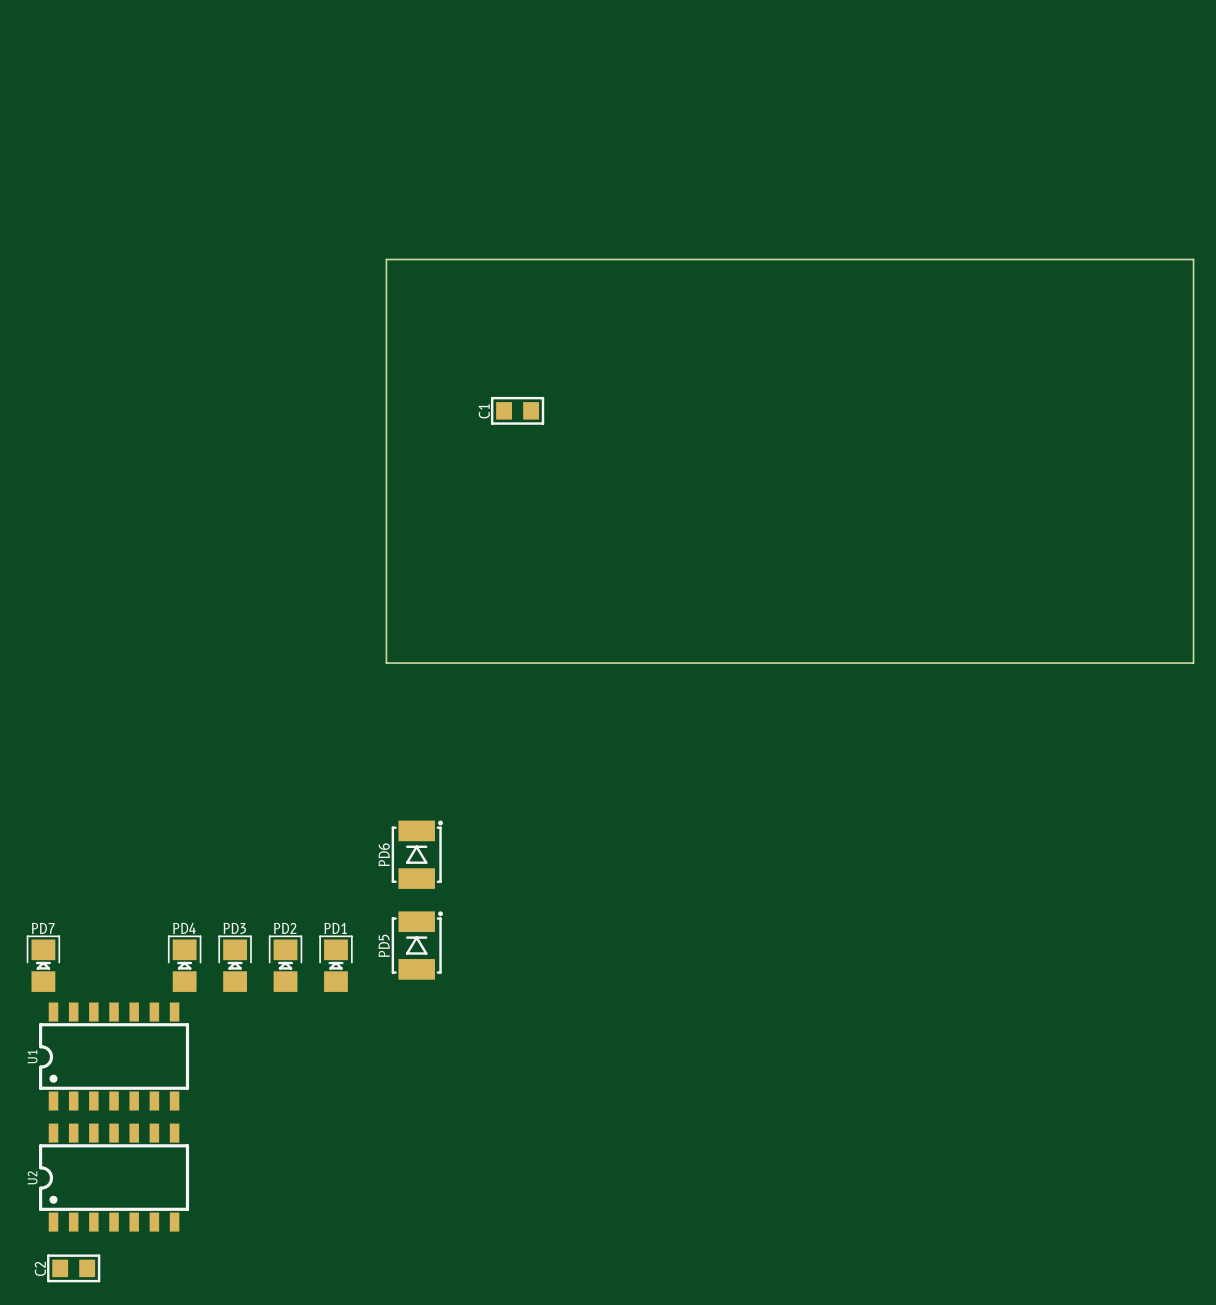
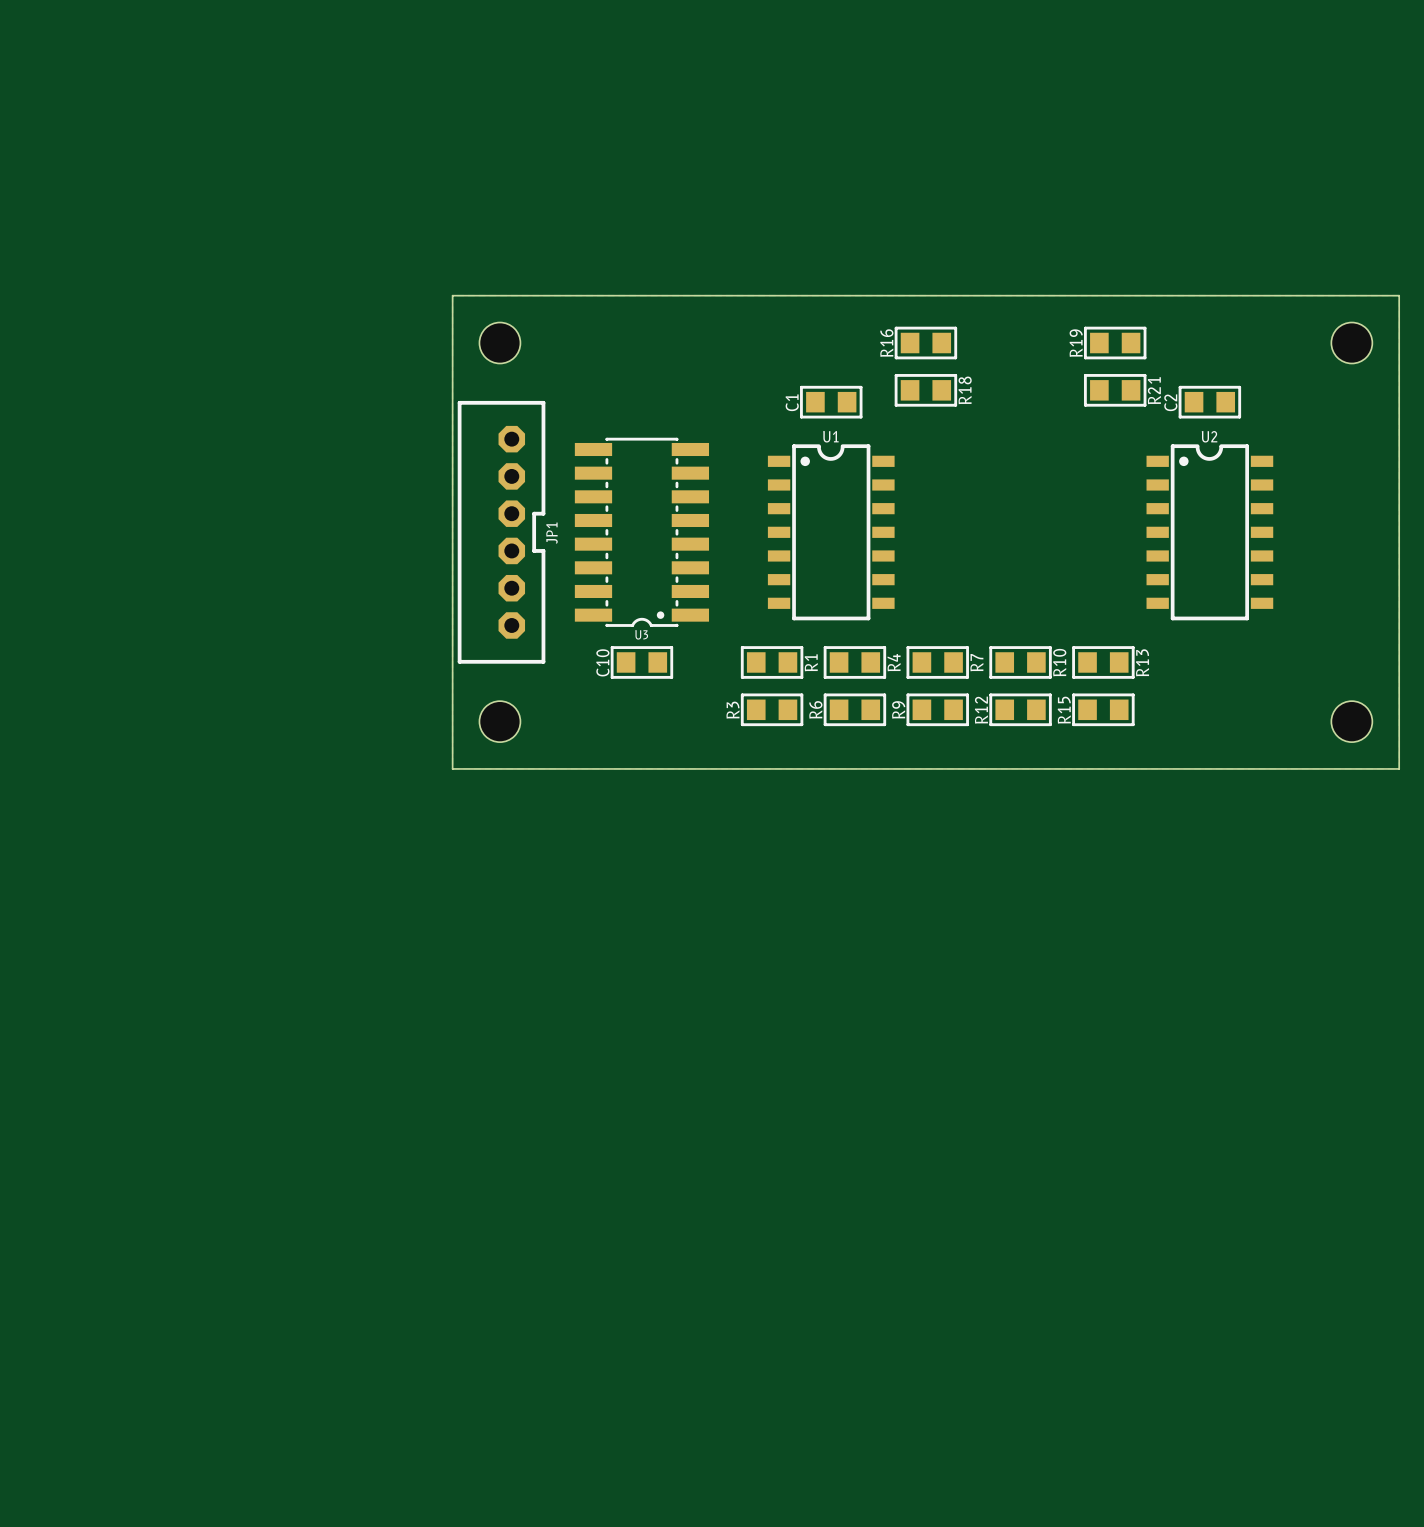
hole: none -> (499, 343)
R16: none -> (925, 343)
R19: none -> (1115, 343)
hole: none -> (1351, 343)
R18: none -> (925, 390)
R21: none -> (1115, 390)
C1 position: (517, 410) -> (831, 402)
JP1: none -> (501, 532)
U3: none -> (641, 532)
C10: none -> (641, 662)
R1: none -> (772, 662)
R4: none -> (854, 662)
R7: none -> (937, 662)
R10: none -> (1020, 662)
R13: none -> (1103, 662)
R3: none -> (772, 709)
R6: none -> (854, 709)
R9: none -> (937, 709)
R12: none -> (1020, 709)
R15: none -> (1103, 709)
hole: none -> (499, 721)
hole: none -> (1351, 721)
PD6: (417, 854) -> none
PD5: (417, 945) -> none
PD7: (43, 963) -> none
PD4: (184, 963) -> none
PD3: (235, 963) -> none
PD2: (285, 963) -> none
PD1: (335, 963) -> none
U1 rotation: 0° (114, 1056) -> 90° clockwise (831, 532)
U1 position: (114, 1056) -> (831, 532)
U2 rotation: 0° (114, 1177) -> 90° clockwise (1209, 532)
U2 position: (114, 1177) -> (1209, 532)
C2 position: (73, 1268) -> (1209, 402)

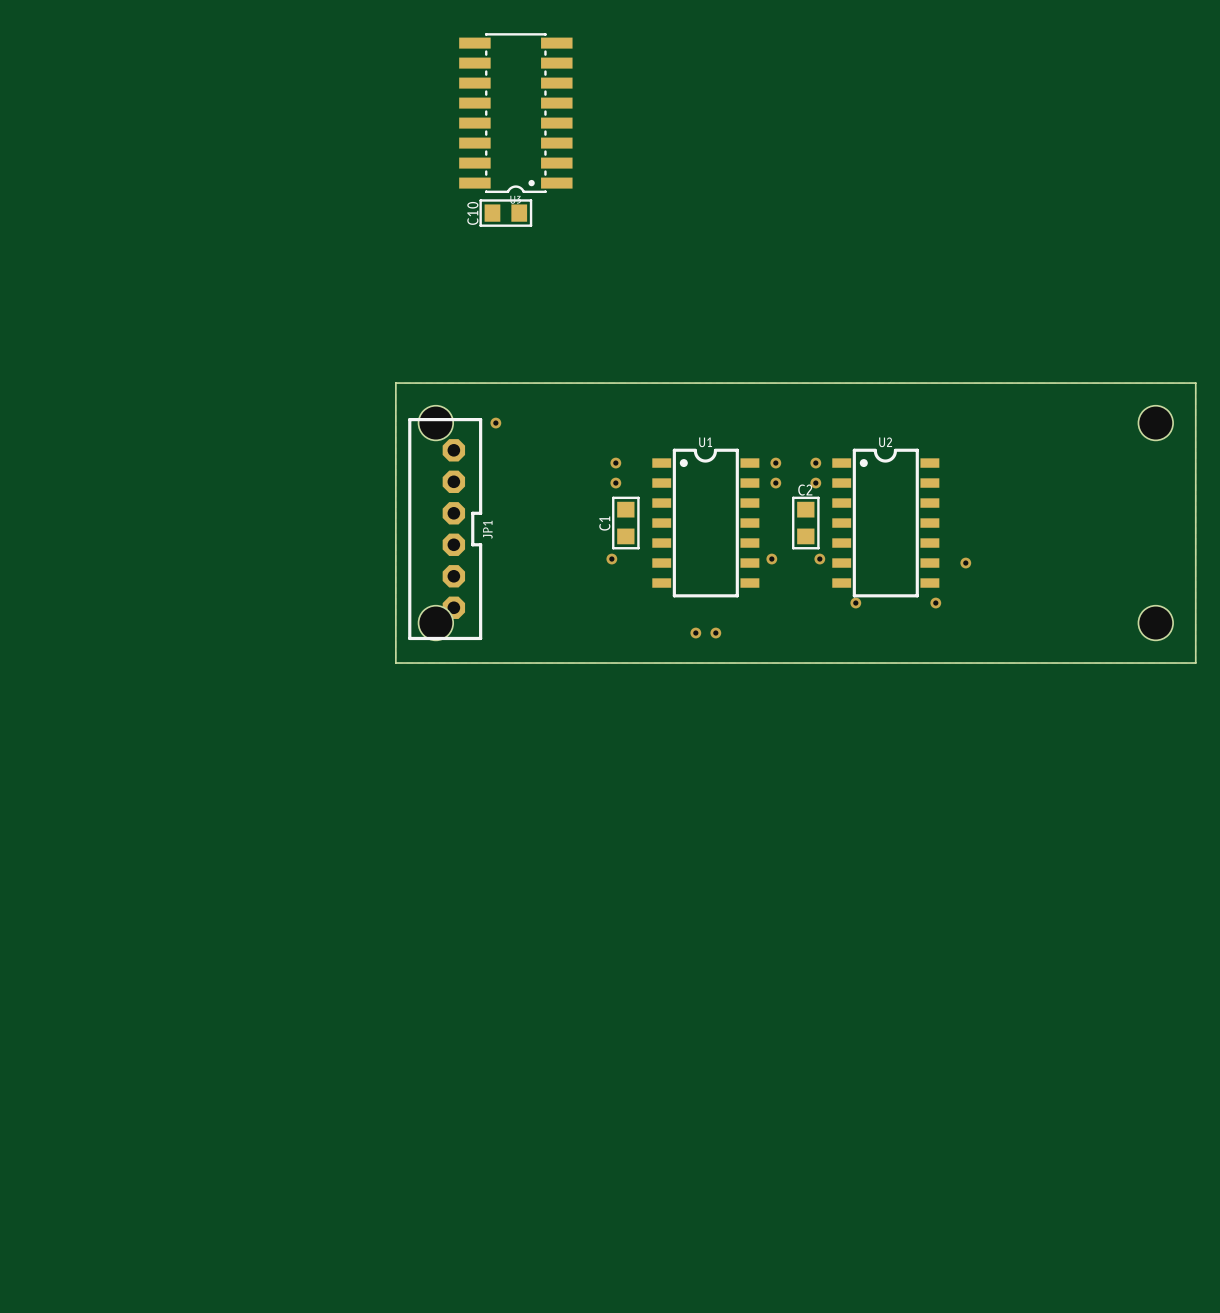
hole position: (499, 343) -> (435, 423)
R16: (925, 343) -> none
R19: (1115, 343) -> none
hole position: (1351, 343) -> (1155, 423)
R18: (925, 390) -> none
R21: (1115, 390) -> none
C1 rotation: 0° (831, 402) -> 90° clockwise (625, 523)
C1 position: (831, 402) -> (625, 523)
C2 rotation: 0° (1209, 402) -> 90° clockwise (805, 523)
C2 position: (1209, 402) -> (805, 523)
board edge: (452, 437) (452, 295) (1399, 295) (1399, 437) -> (395, 383) (1195, 383)
via: none -> (495, 423)
JP1 position: (501, 532) -> (445, 529)
U3 position: (641, 532) -> (515, 113)
via: none -> (615, 463)
U1 position: (831, 532) -> (705, 523)
via: none -> (775, 463)
via: none -> (815, 463)
U2 position: (1209, 532) -> (885, 523)
via: none -> (615, 483)
via: none -> (775, 483)
via: none -> (815, 483)
via: none -> (611, 559)
via: none -> (771, 559)
via: none -> (819, 559)
via: none -> (965, 563)
C10 position: (641, 662) -> (505, 213)
R1: (772, 662) -> none
R4: (854, 662) -> none
R7: (937, 662) -> none
R10: (1020, 662) -> none
R13: (1103, 662) -> none
via: none -> (855, 603)
via: none -> (935, 603)
R3: (772, 709) -> none
R6: (854, 709) -> none
R9: (937, 709) -> none
R12: (1020, 709) -> none
R15: (1103, 709) -> none
via: none -> (695, 633)
via: none -> (715, 633)

